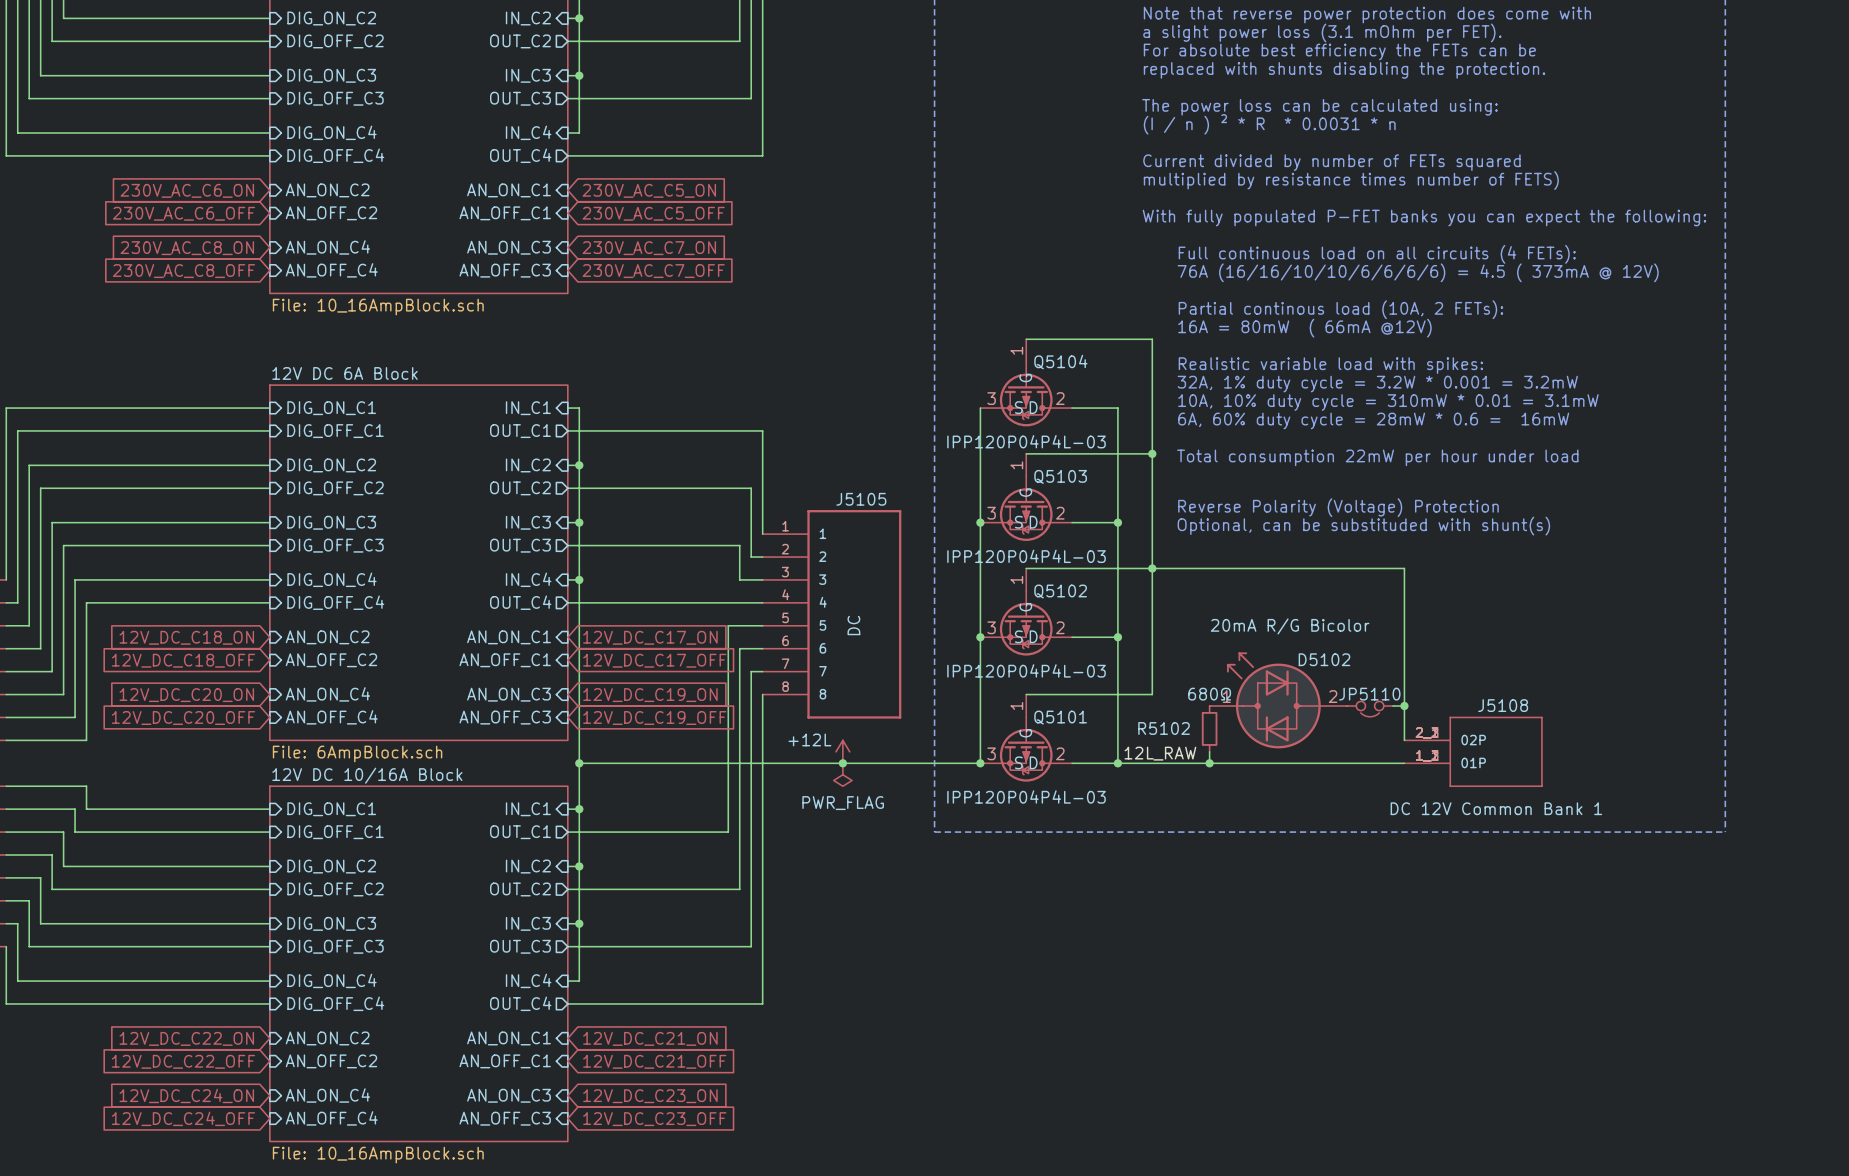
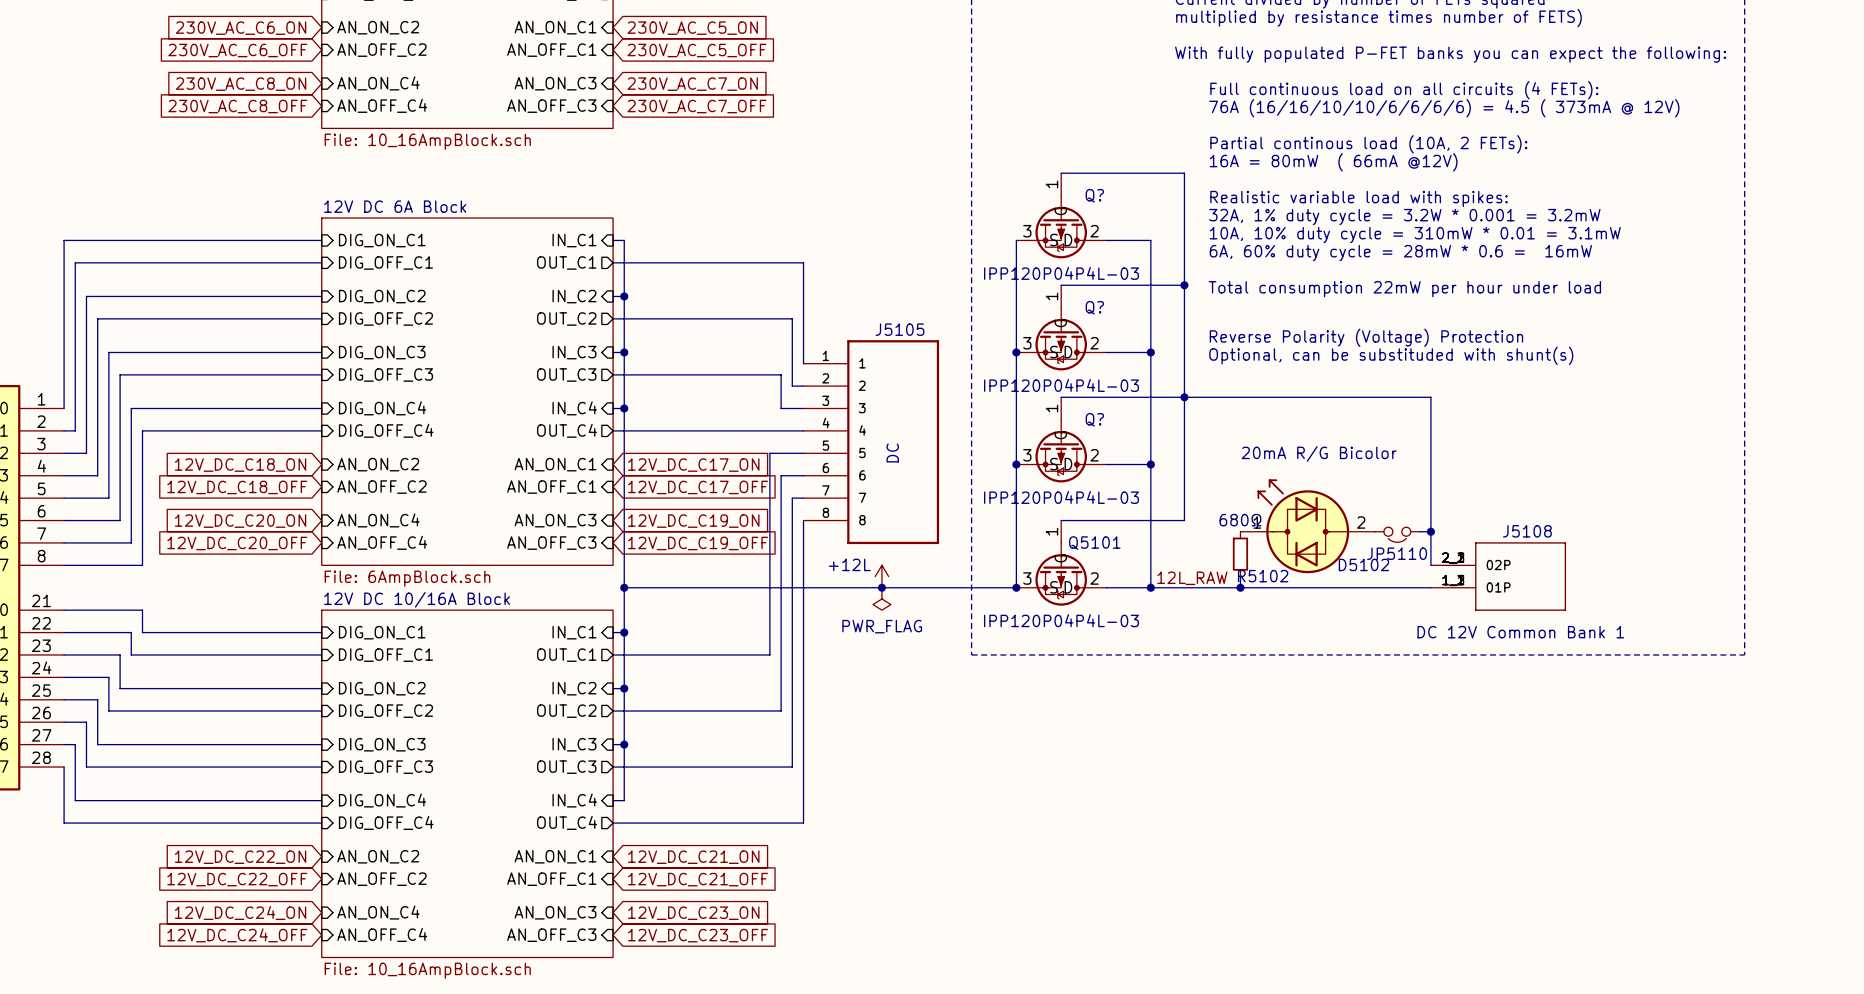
Q5104 name: Q5104 (1060, 362) -> Q? (1094, 195)
Q5103 name: Q5103 (1060, 476) -> Q? (1094, 307)
Q5102 name: Q5102 (1060, 591) -> Q? (1094, 419)
D5102 name position: D5102 (1324, 659) -> D5102 (1363, 564)
JP5110 name position: JP5110 (1369, 694) -> JP5110 (1397, 553)
R5102 name position: R5102 (1164, 728) -> R5102 (1263, 576)

